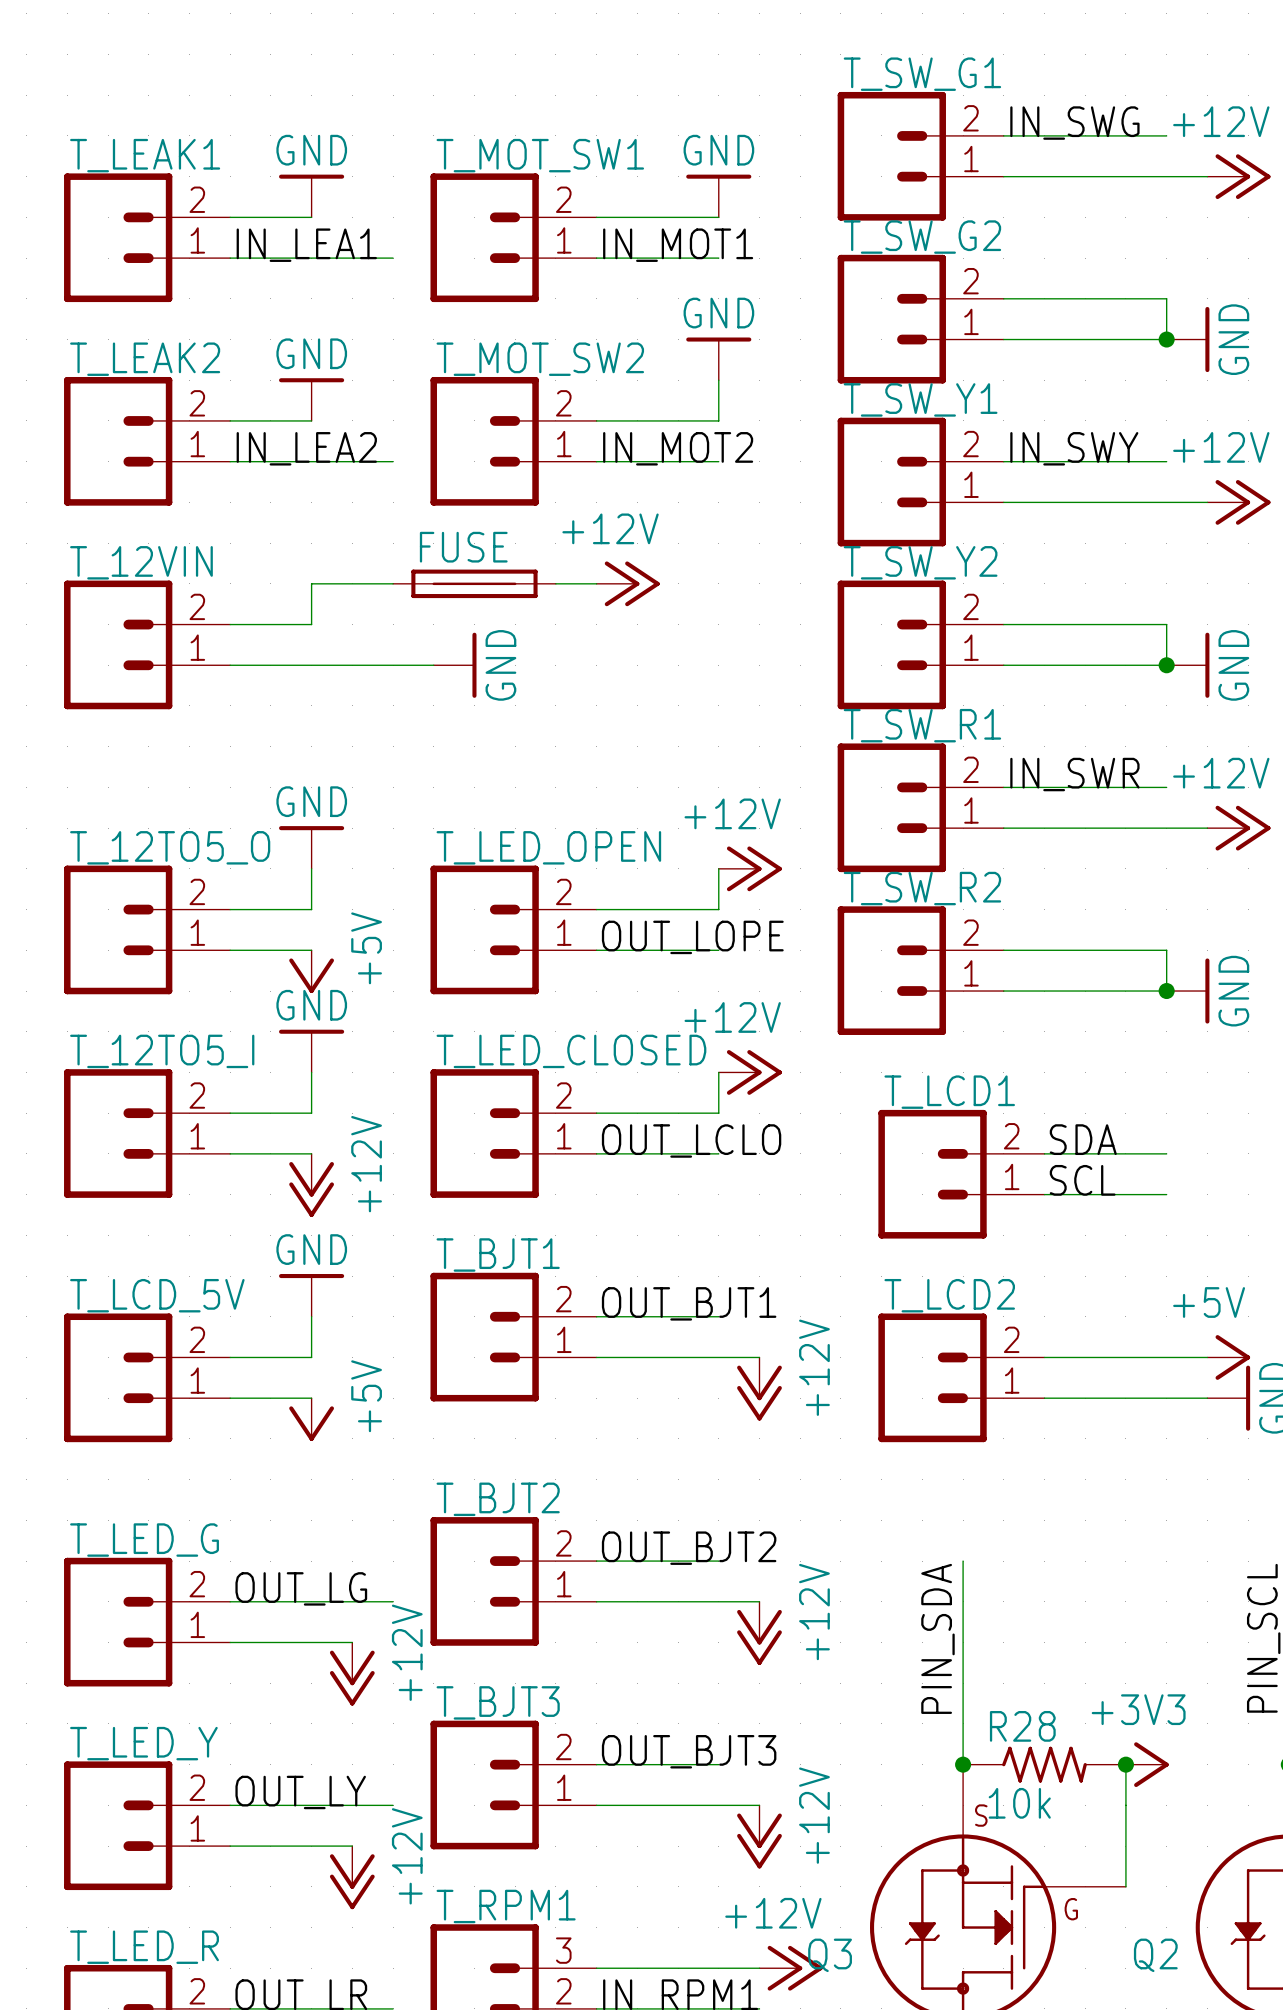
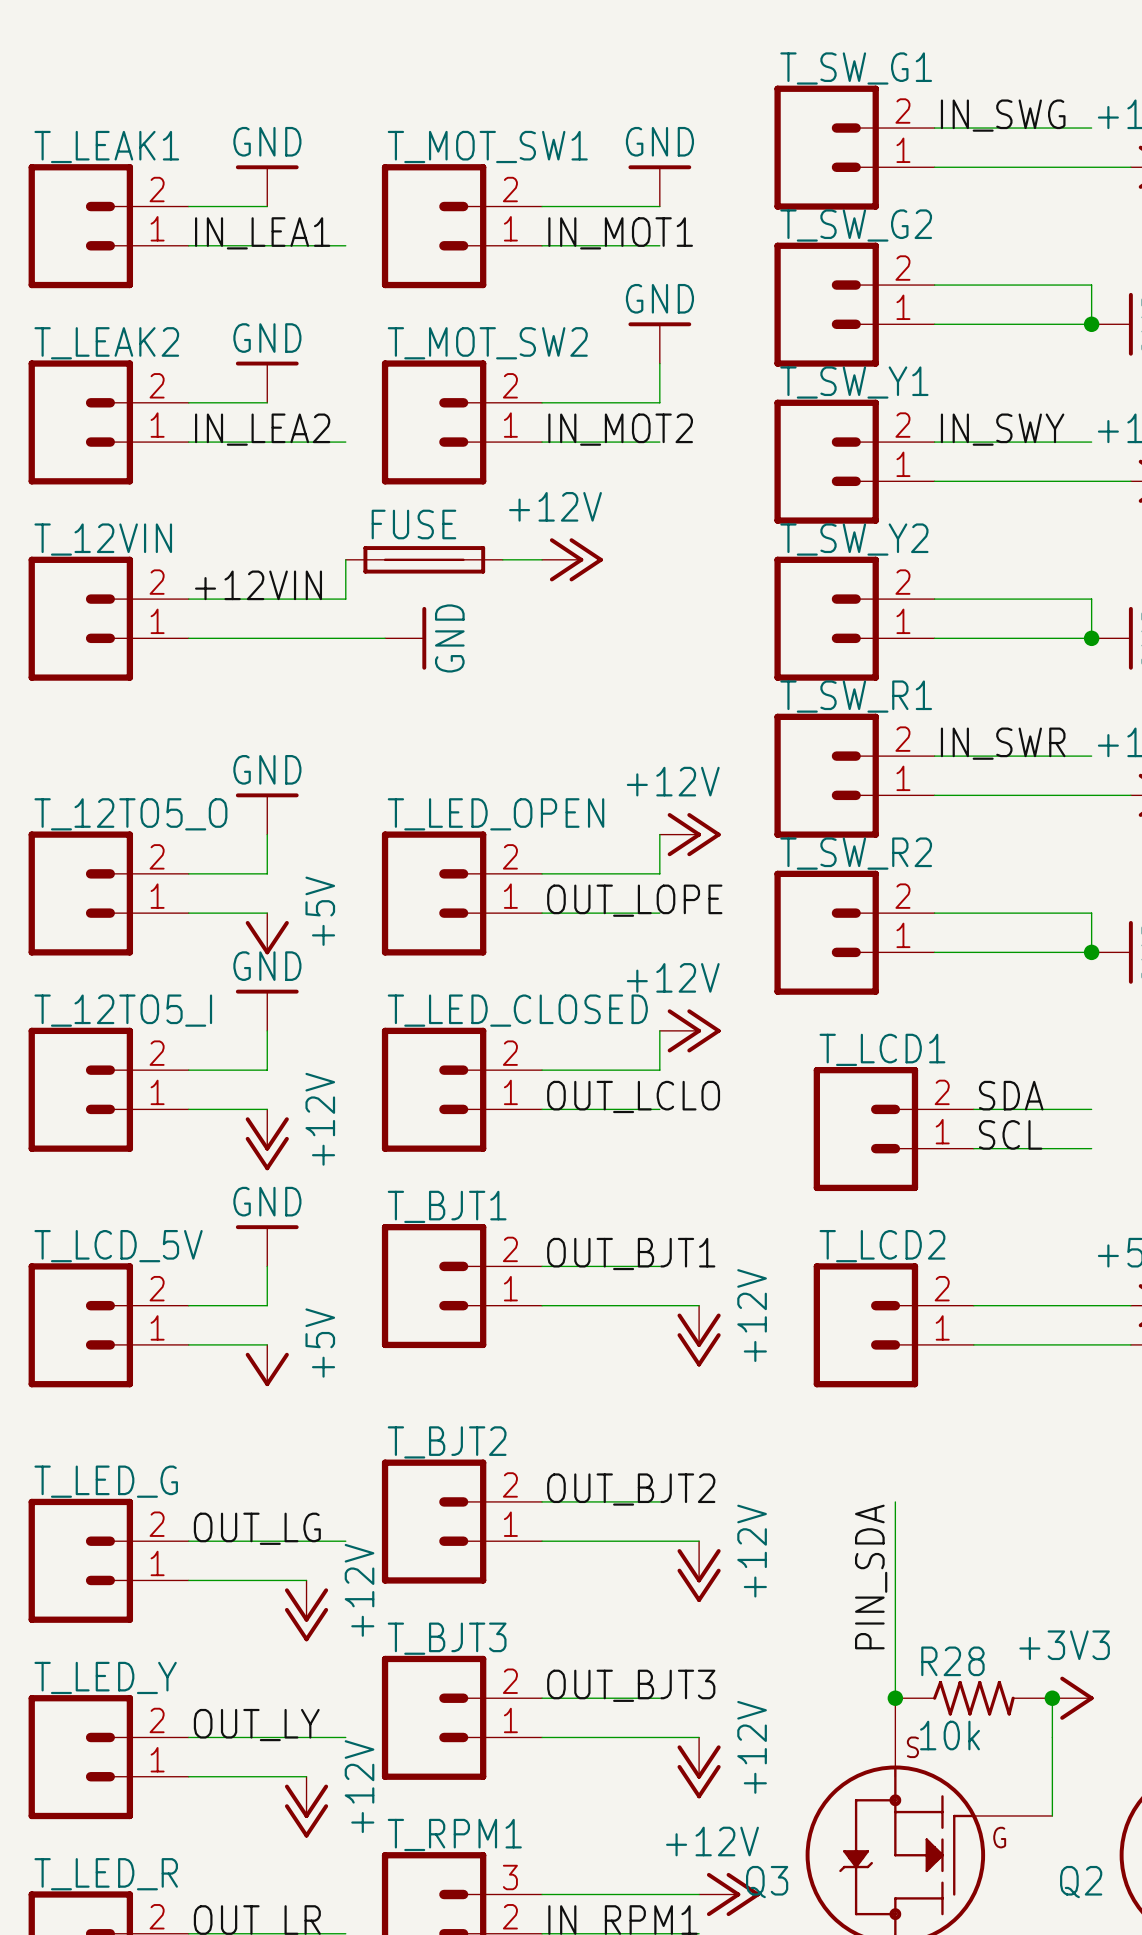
wire: (393, 583) (311, 583) (311, 624) -> (345, 559) (345, 599) (267, 599)
label: none -> +12VIN (258, 585)

